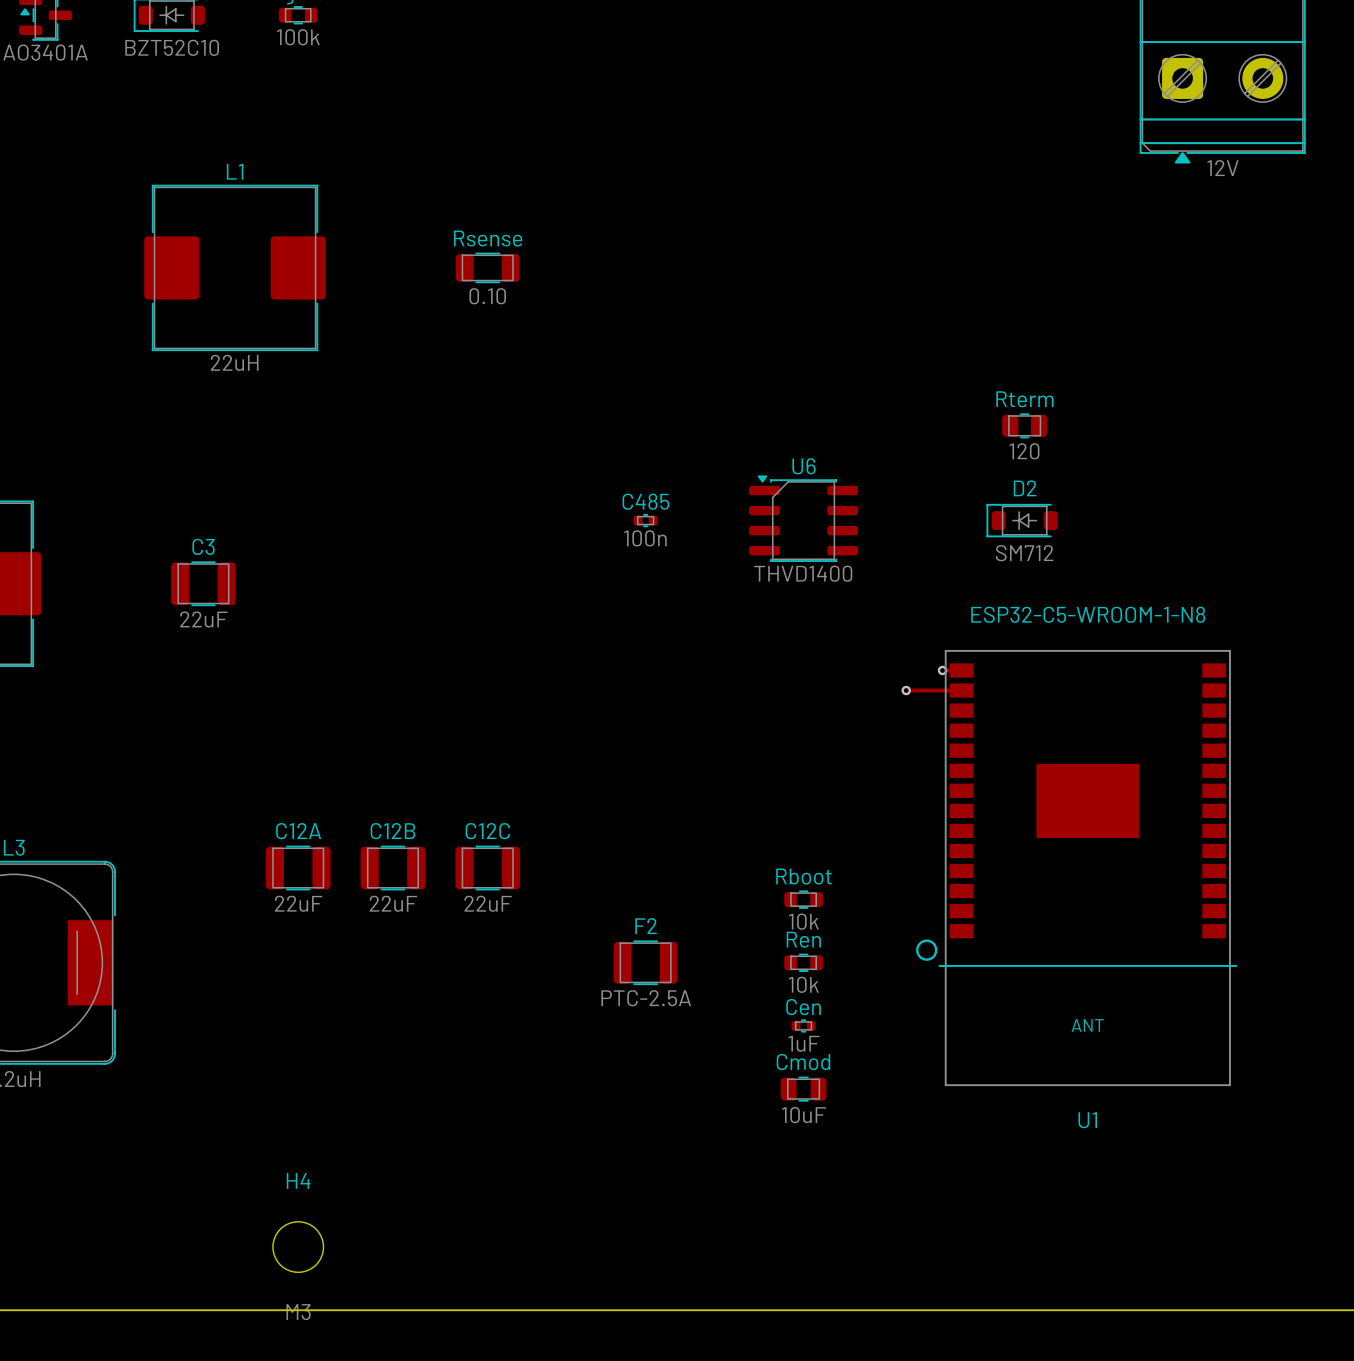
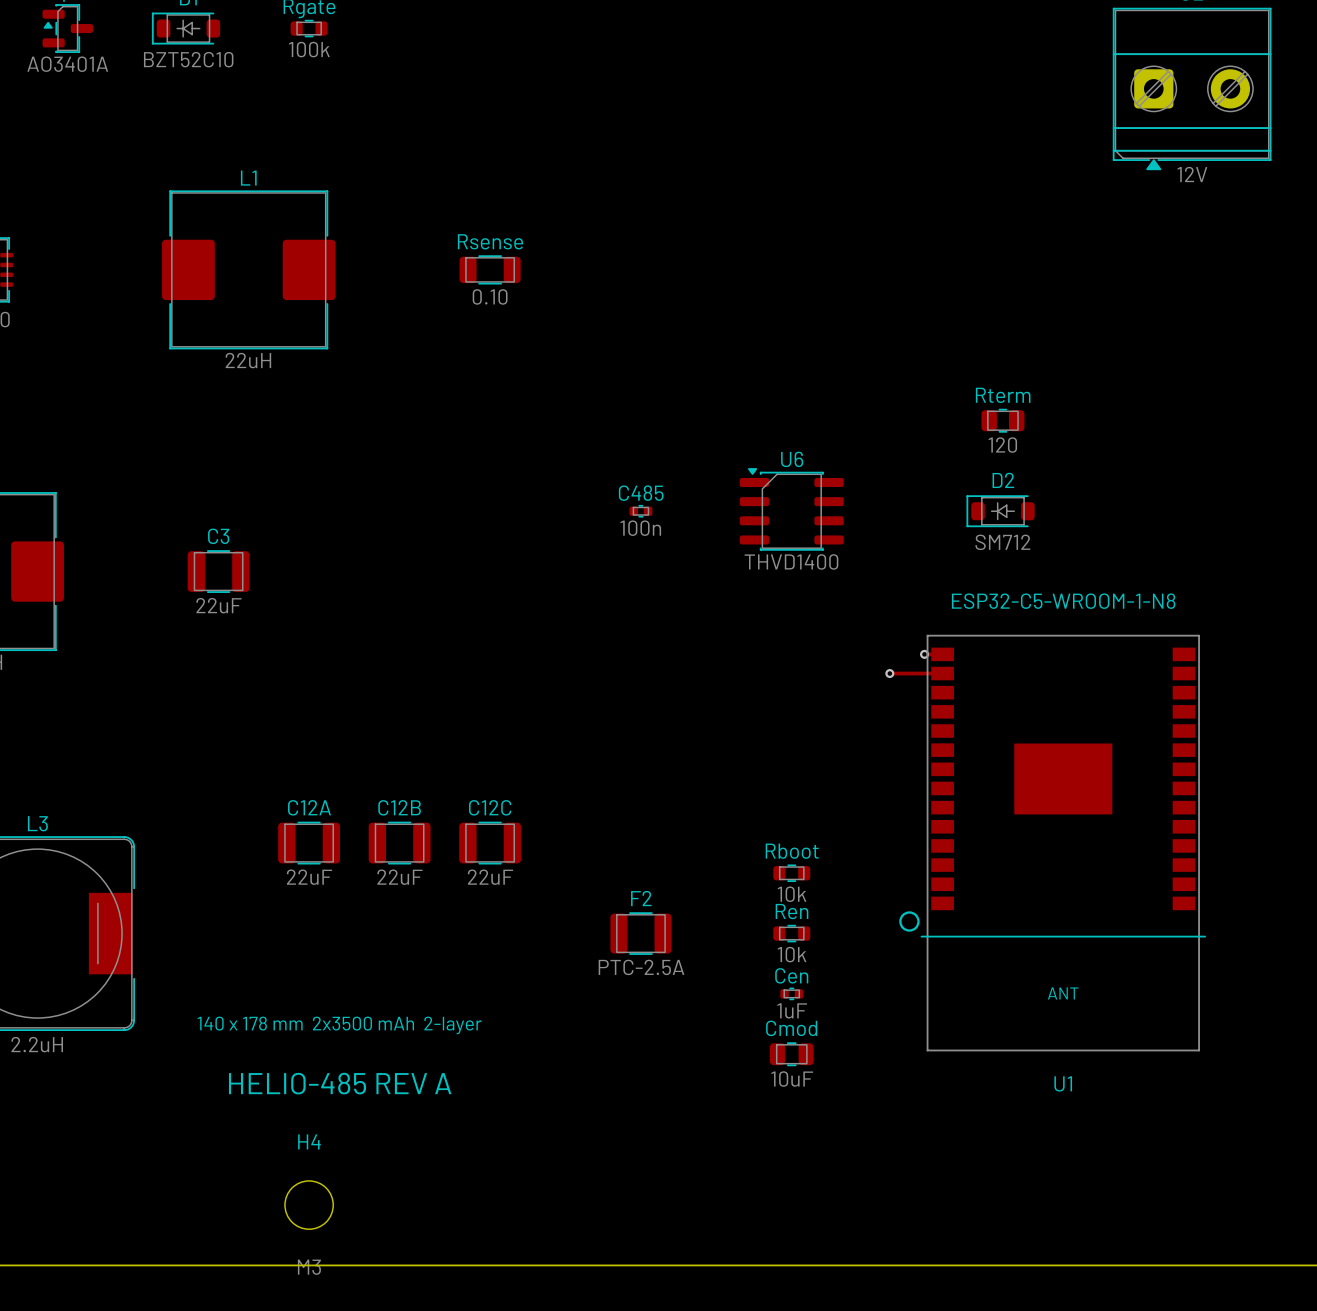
text: none -> 140 x 178 mm 2x3500 mAh 2-layer (339, 1025)
text: none -> HELIO-485 REV A (340, 1083)

